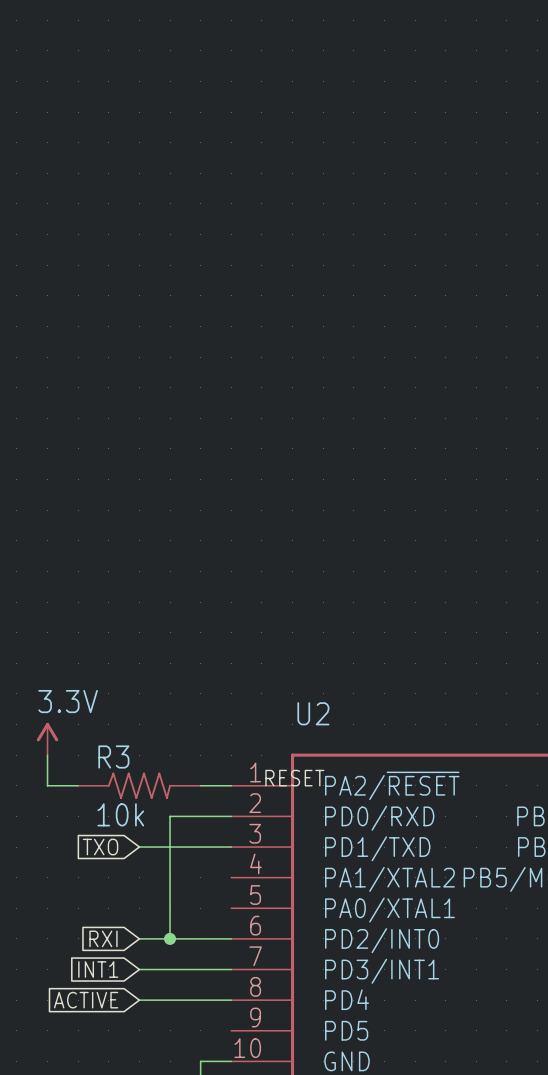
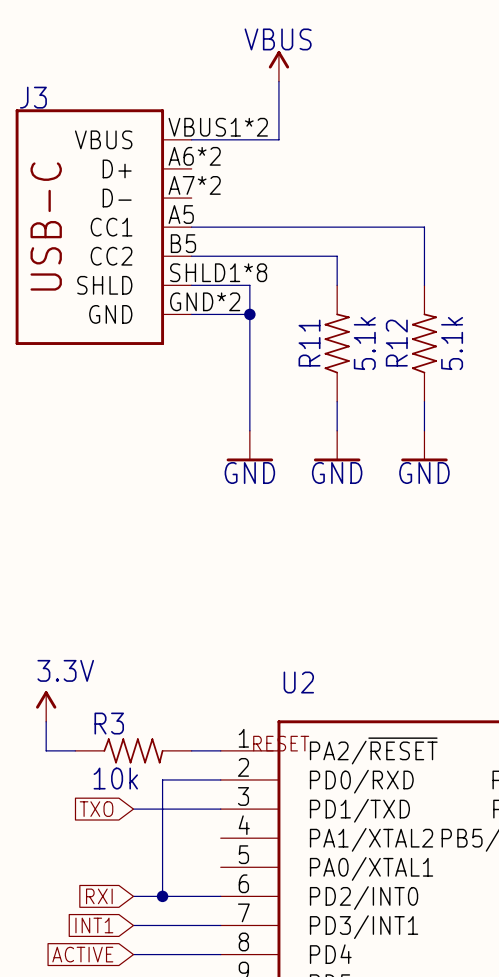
power symbol: none -> VBUS (278, 66)
wire: none -> (278, 81) (278, 139) (191, 139)
J3: none -> (103, 227)
wire: none -> (191, 227) (424, 227) (424, 285)
wire: none -> (191, 256) (337, 256) (337, 285)
wire: none -> (191, 285) (249, 285) (249, 430)
wire: none -> (191, 314) (249, 314)
junction: none -> (249, 314)
R11: none -> 5.1k (337, 343)
R12: none -> 5.1k (424, 343)
wire: none -> (337, 401) (337, 430)
wire: none -> (424, 401) (424, 430)
power symbol: none -> GND (249, 446)
power symbol: none -> GND (337, 446)
power symbol: none -> GND (424, 446)

